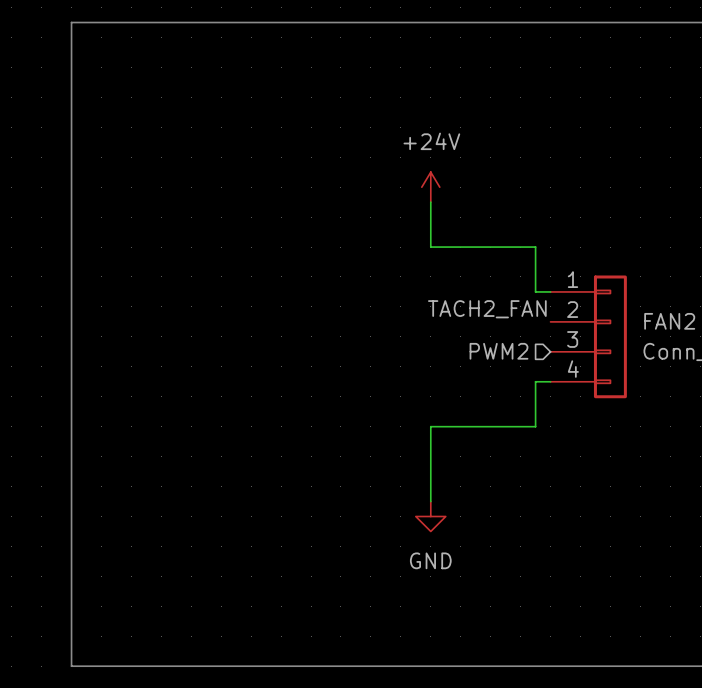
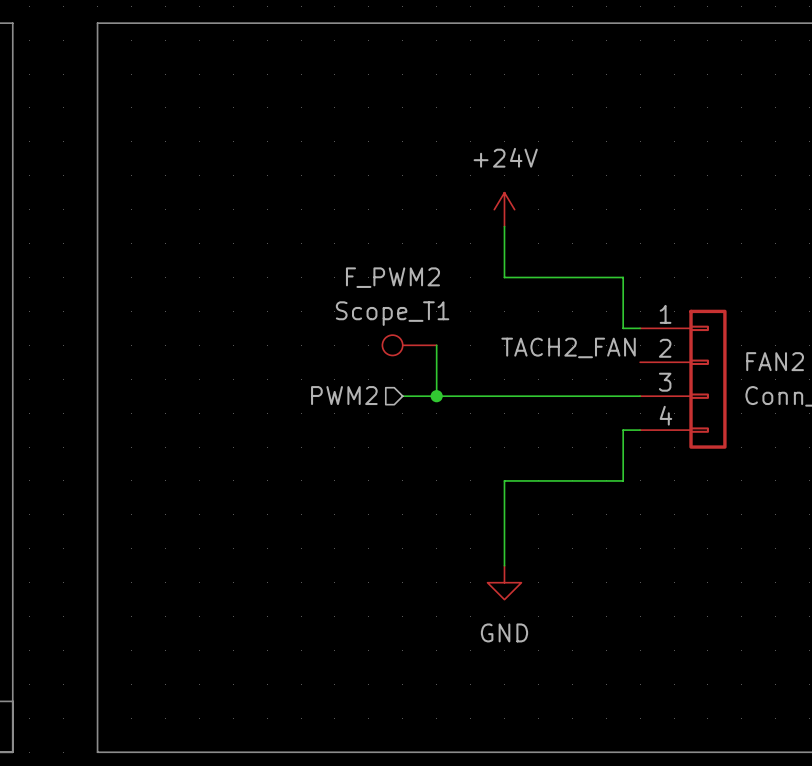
F_PWM2: none -> Scope_T1 (409, 345)
wire: none -> (436, 345) (436, 396)
wire: none -> (402, 396) (640, 396)
junction: none -> (436, 396)
hierarchical label position: PWM2 (498, 351) -> PWM2 (344, 395)

